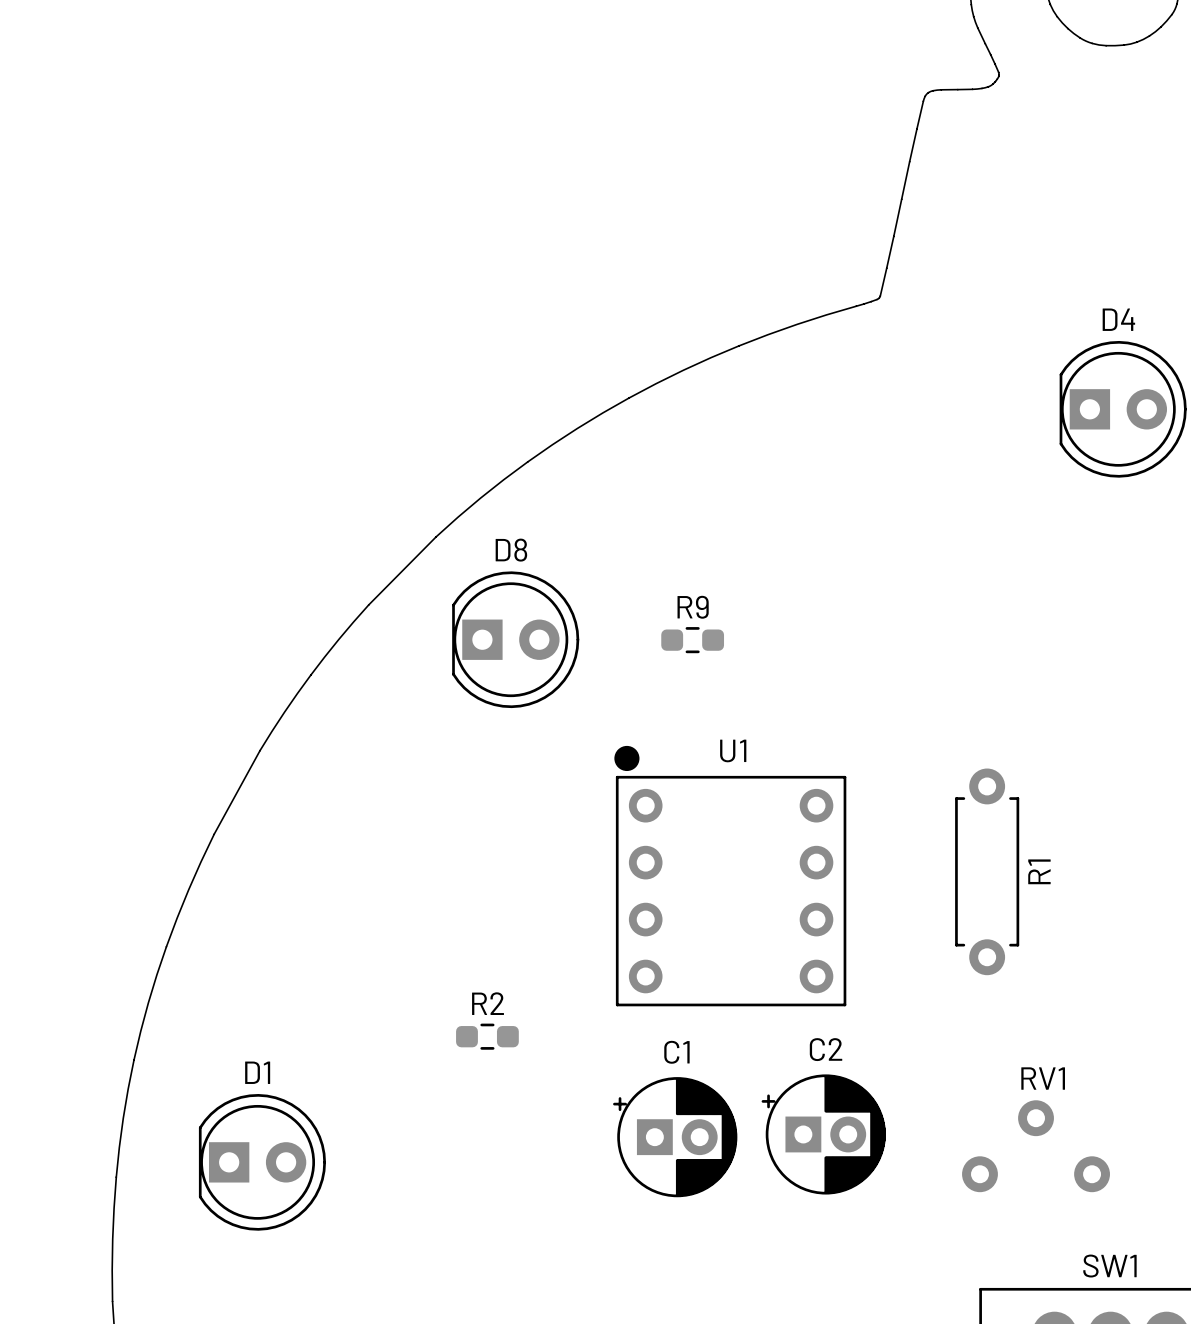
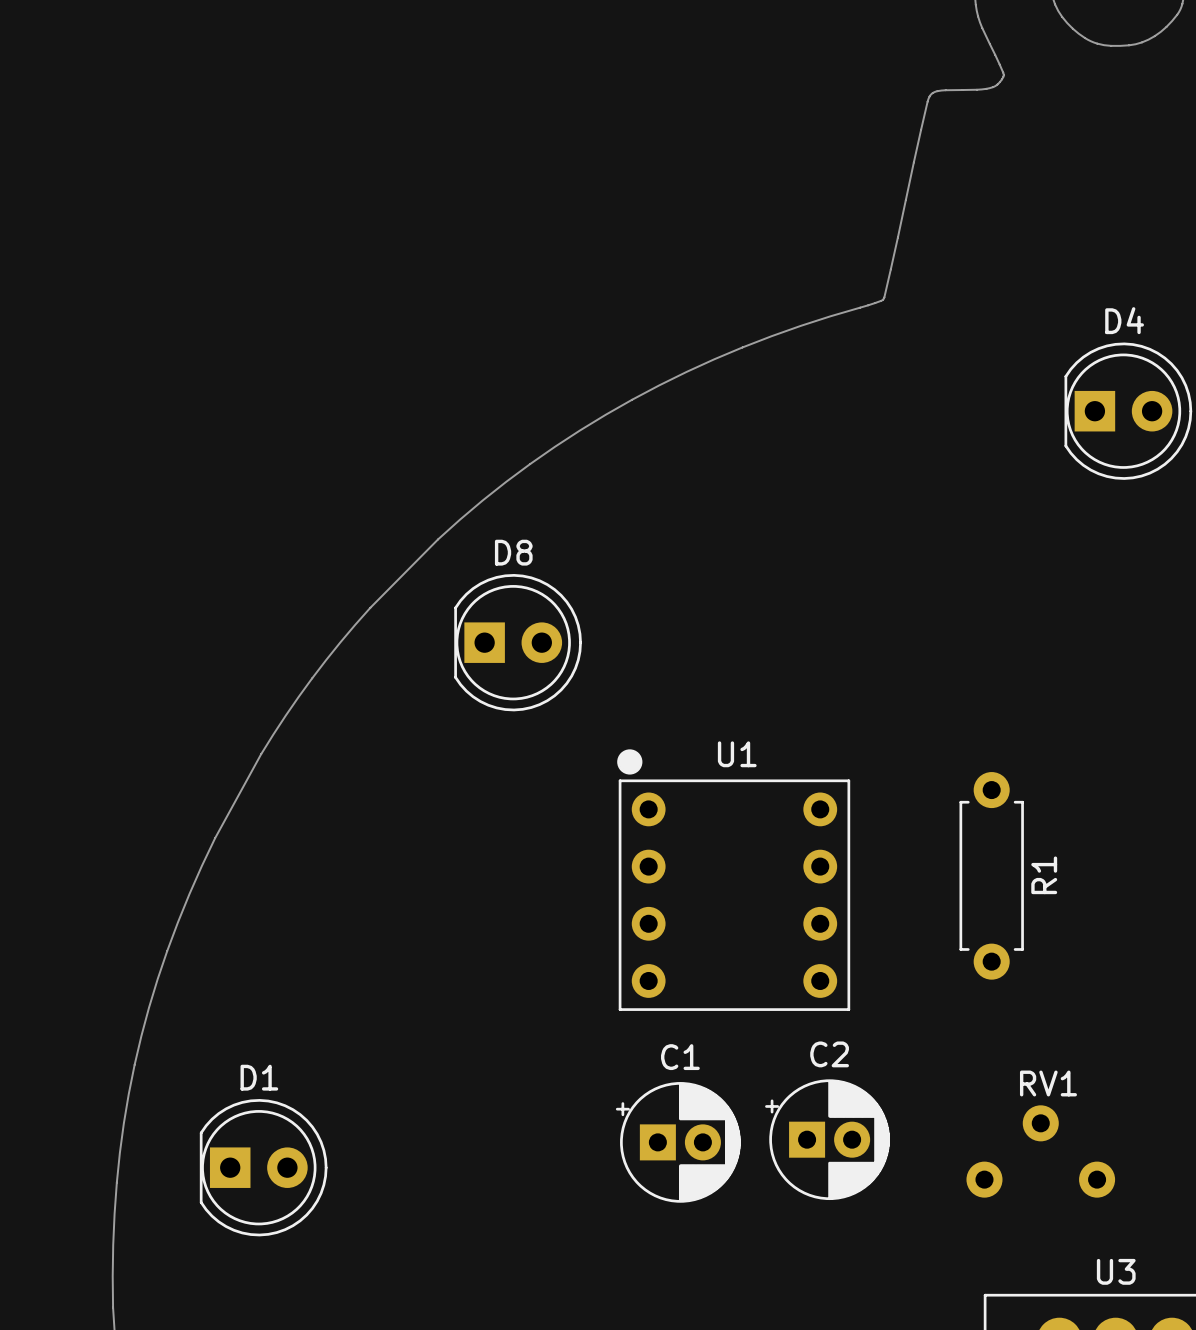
R9: (692, 640) -> none
R2: (487, 1036) -> none
SW1 name: SW1 (1109, 1266) -> U3 (1116, 1271)

